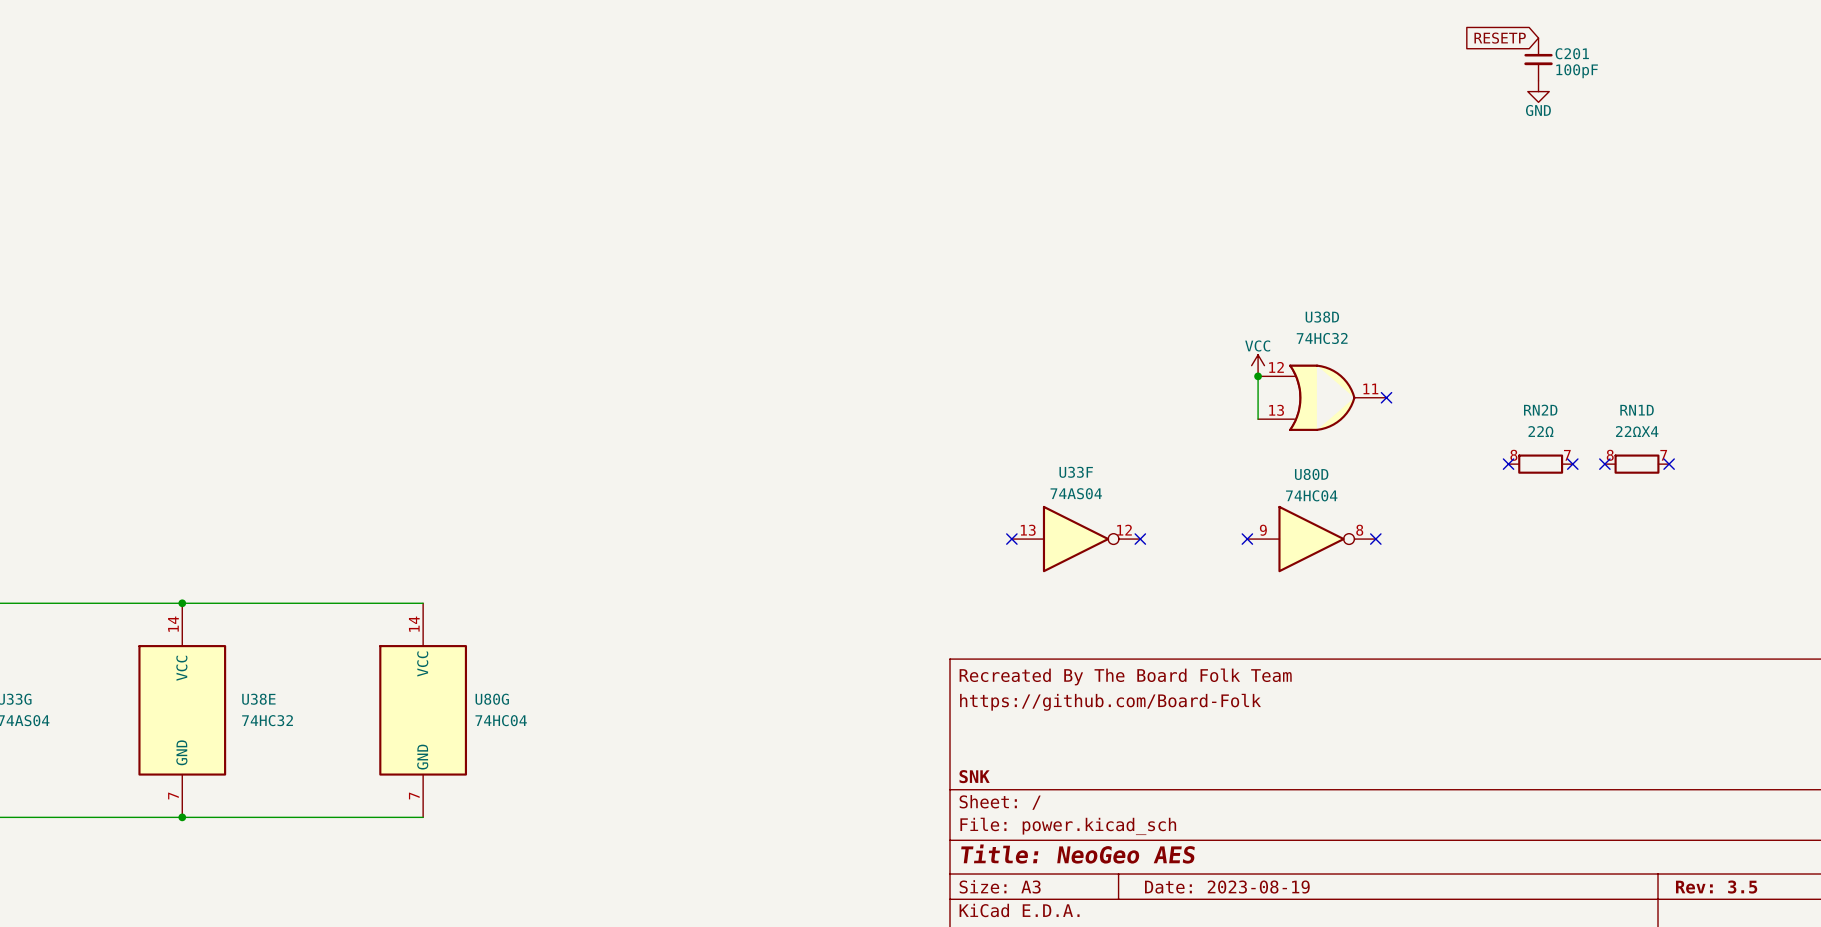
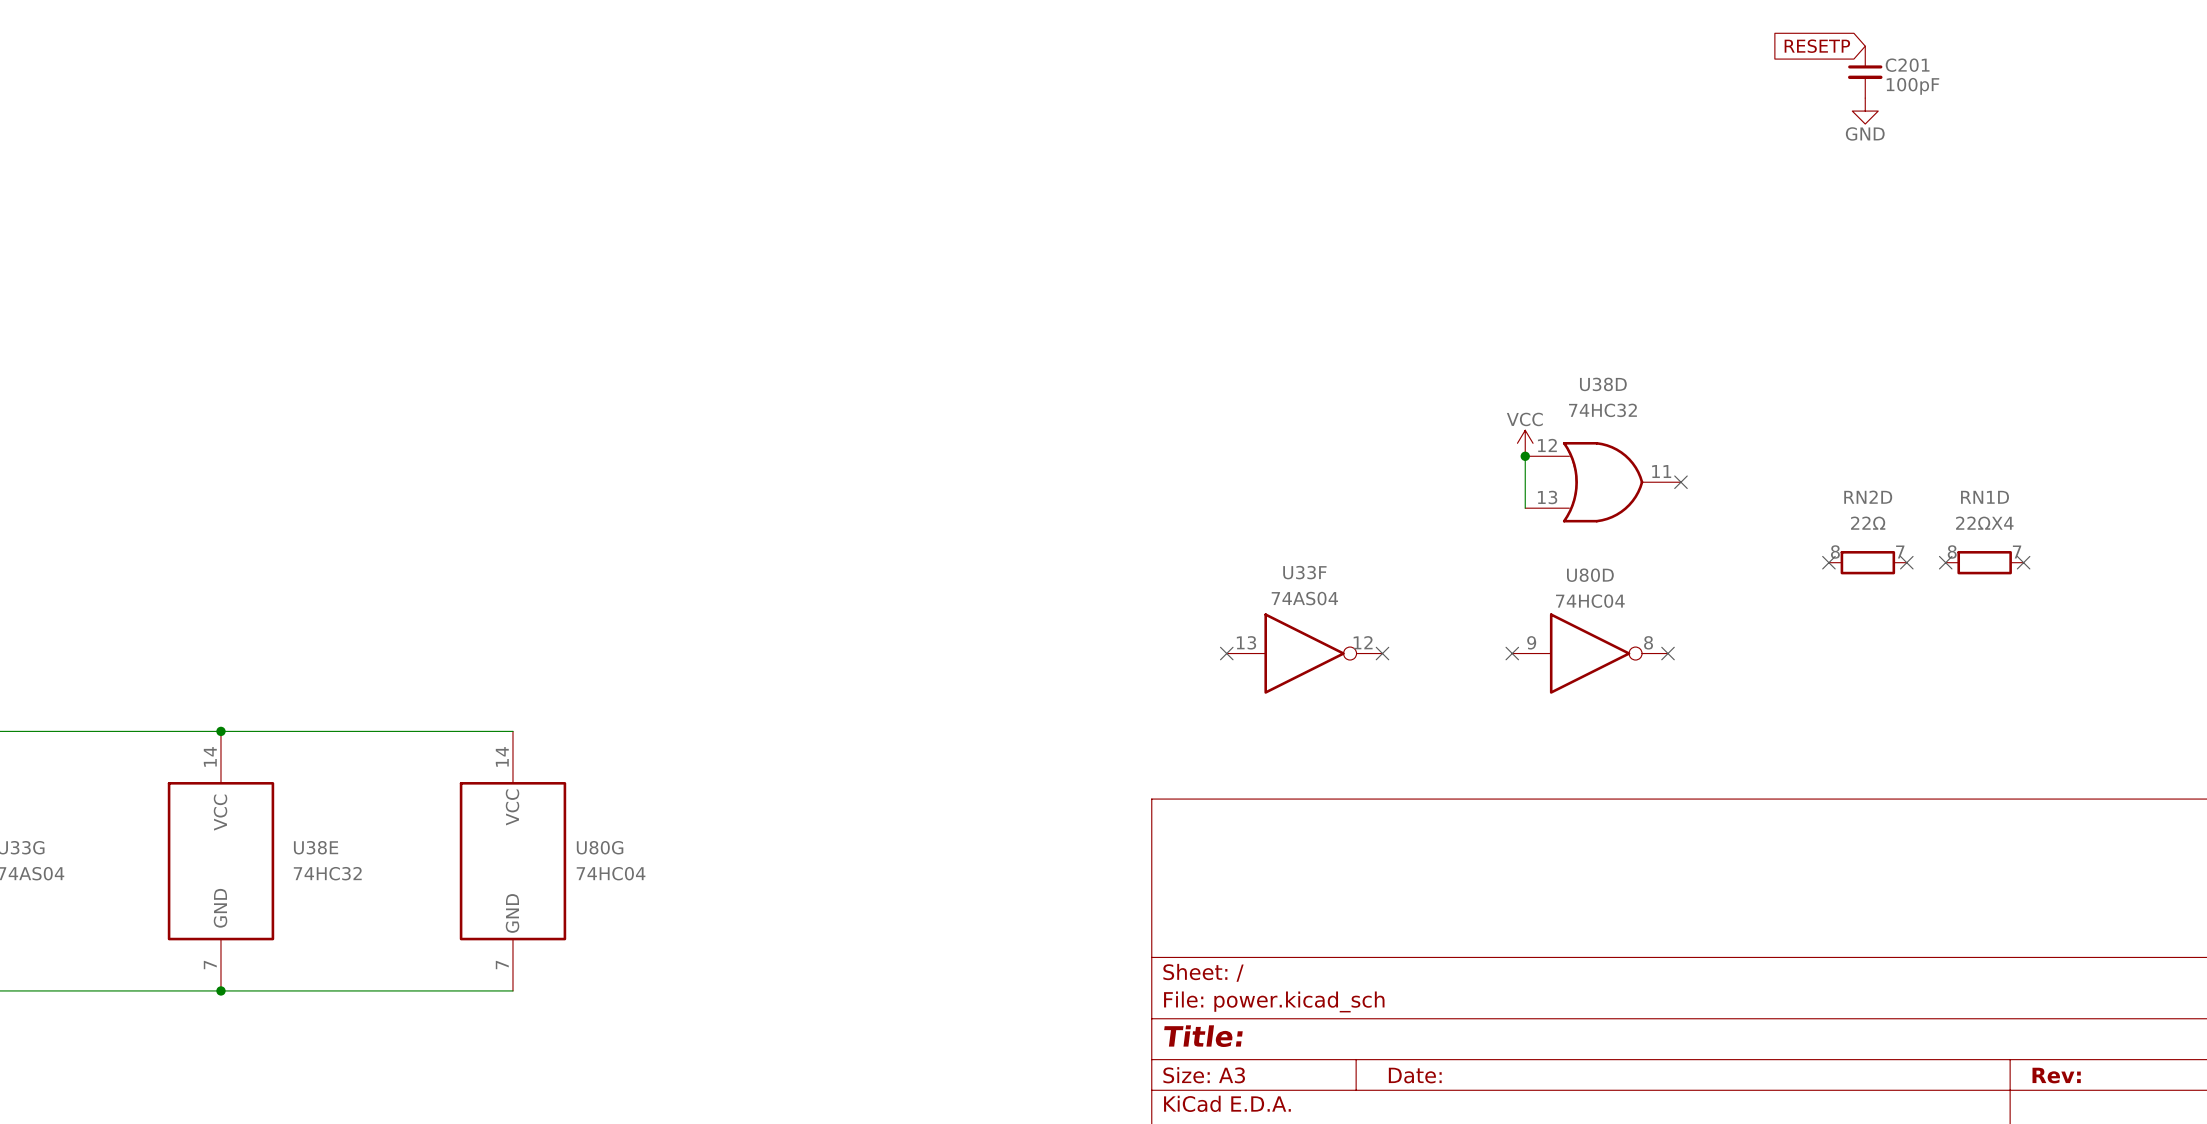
title block: Recreated By The Board Folk Team (1125, 676) -> none
title block: https://github.com/Board-Folk (1110, 702) -> none
title block: SNK (974, 776) -> none
title block: Title: NeoGeo AES (1077, 854) -> Title: (1203, 1036)
title block: Date: 2023-08-19 (1227, 887) -> Date: (1415, 1075)
title block: Rev: 3.5 (1716, 887) -> Rev: (2056, 1075)

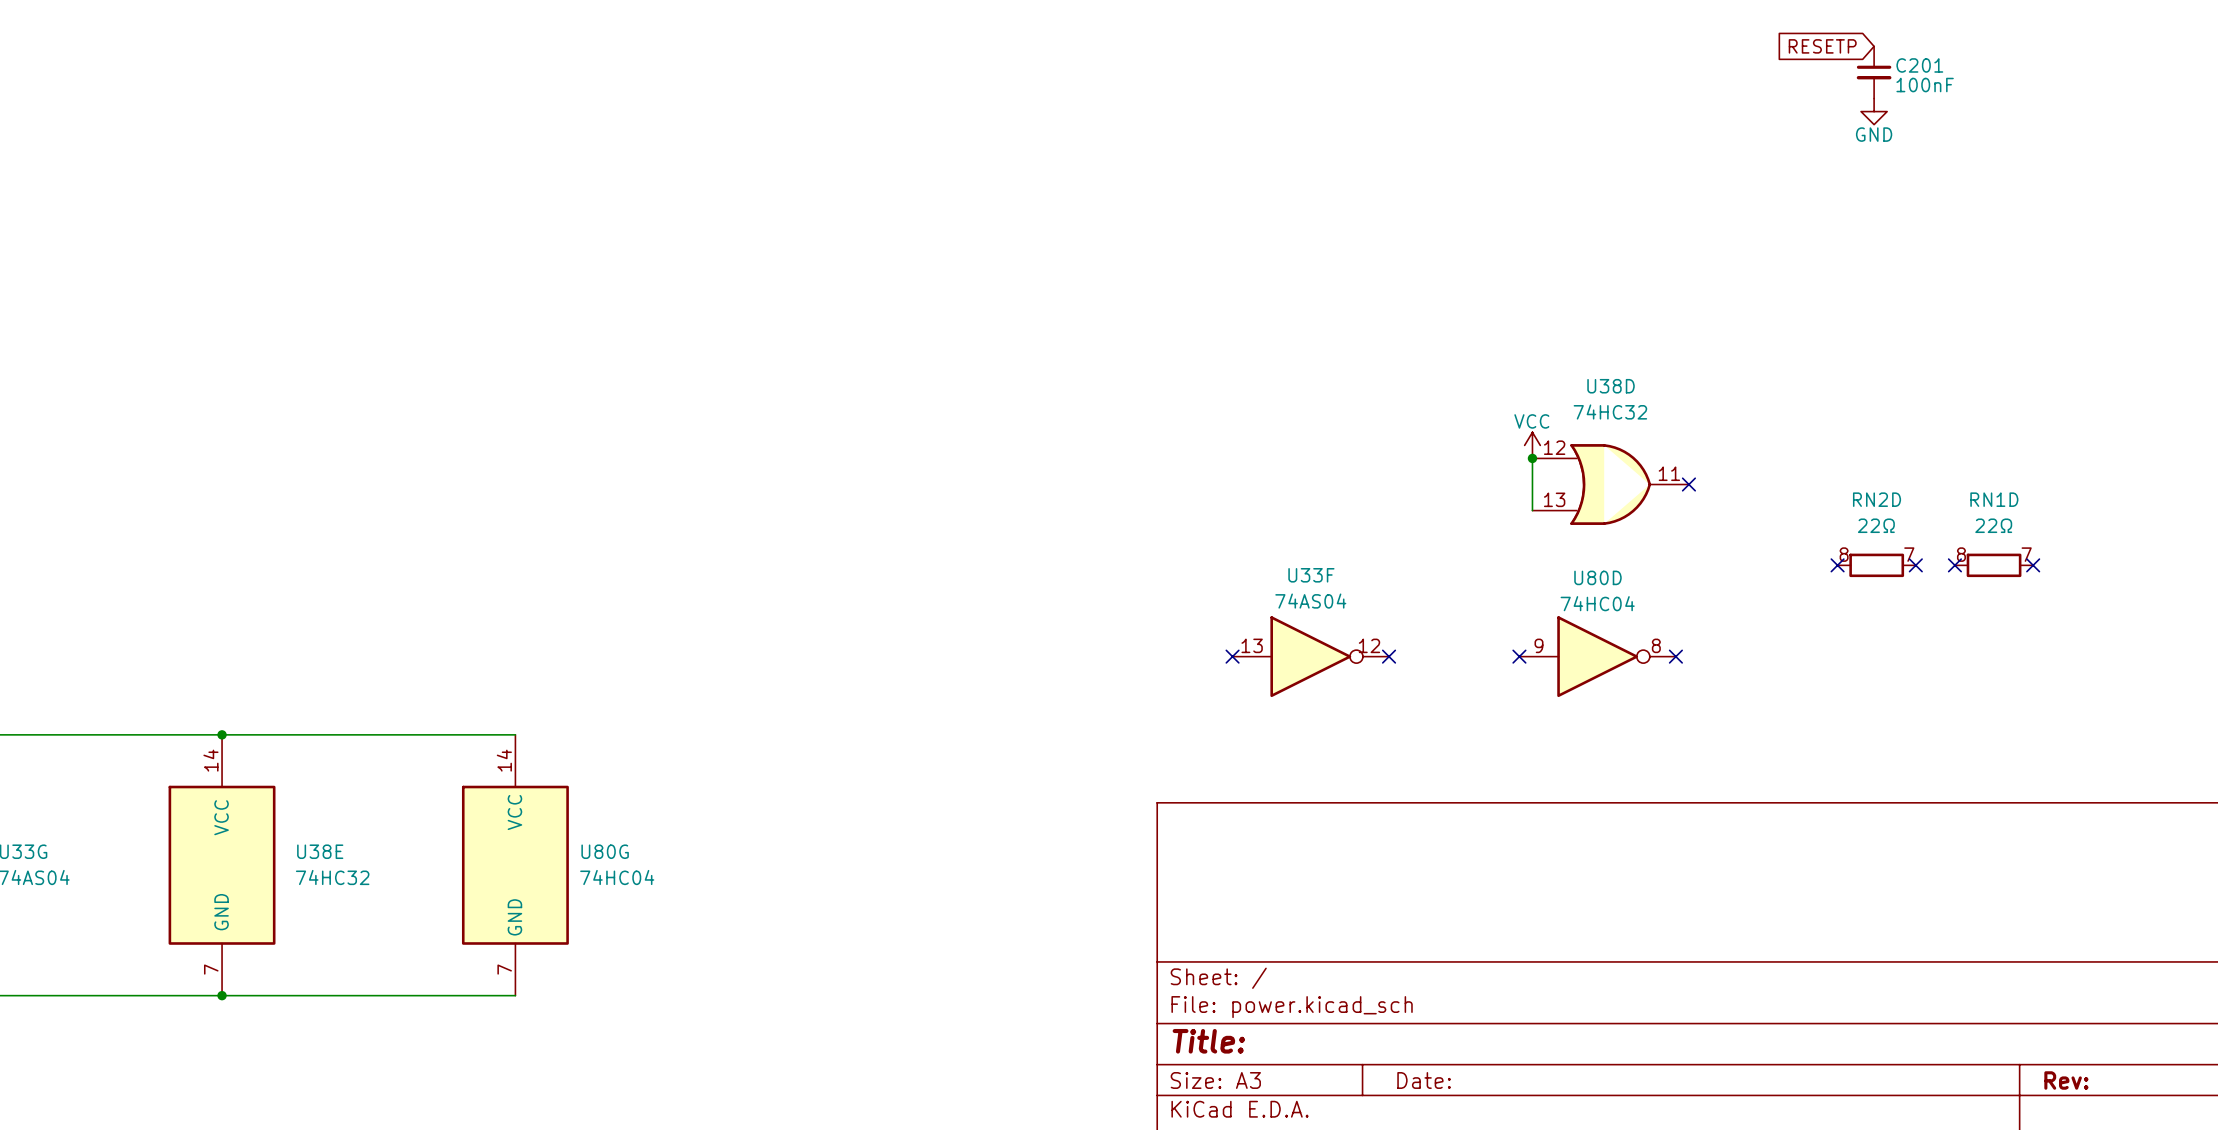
C201 value: 100pF (1912, 86) -> 100nF (1925, 85)
RN1D value: 22ΩX4 (1984, 523) -> 22Ω (1993, 525)

